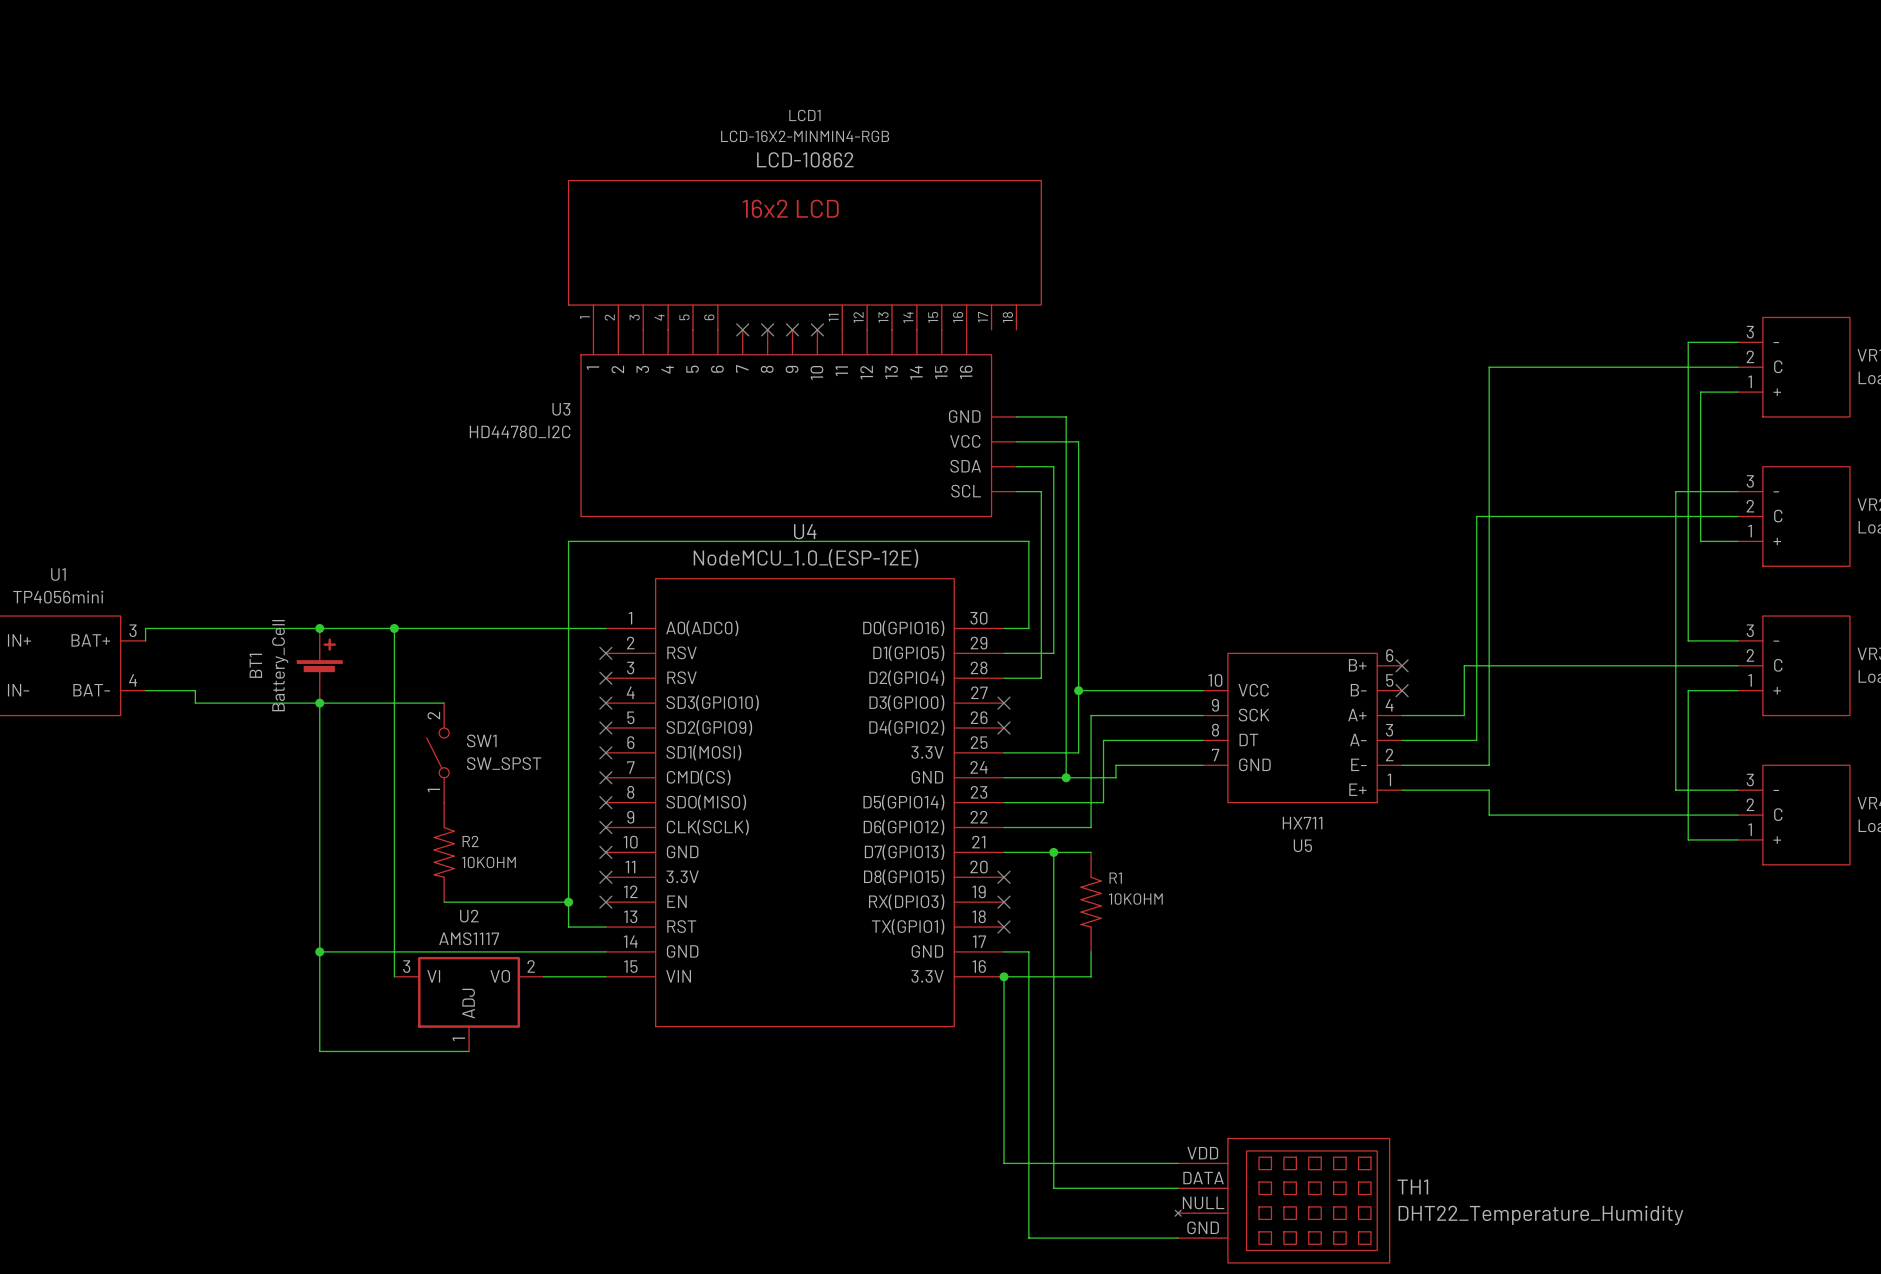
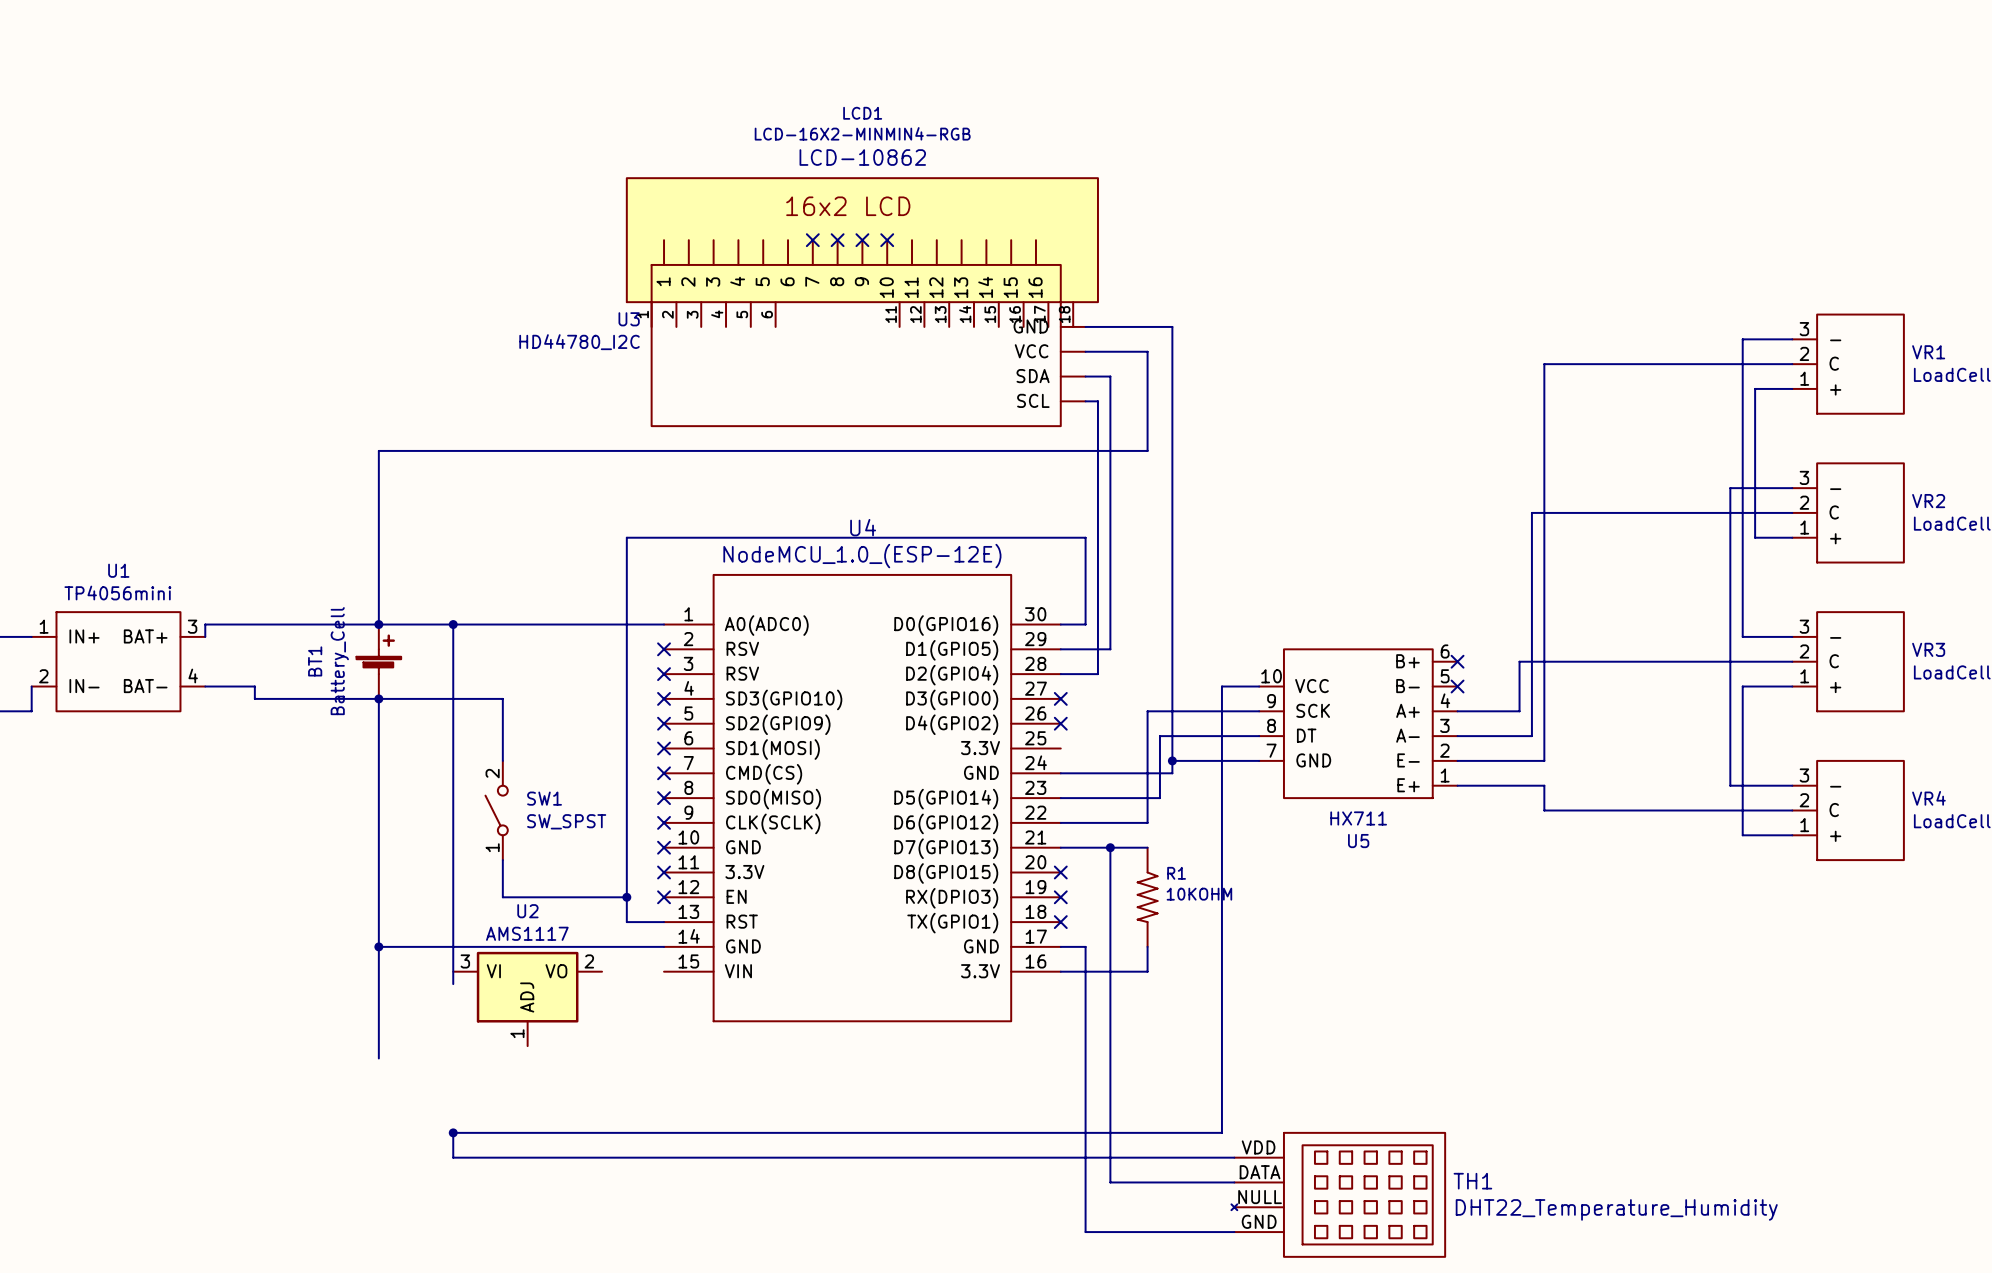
no-connect mark: none -> (812, 240)
no-connect mark: none -> (837, 240)
no-connect mark: none -> (862, 240)
no-connect mark: none -> (887, 240)
no-connect mark: (742, 329) -> none
no-connect mark: (767, 329) -> none
no-connect mark: (792, 329) -> none
no-connect mark: (817, 329) -> none
wire: none -> (1085, 326) (1172, 326) (1172, 760)
wire: none -> (1085, 351) (1147, 351) (1147, 450) (378, 450) (378, 624)
wire: (1016, 416) (1066, 416) (1066, 777) -> none
U3 position: (798, 423) -> (868, 333)
wire: (1016, 441) (1078, 441) (1078, 752) (1003, 752) -> none
wire: (1016, 466) (1053, 466) -> (1085, 376) (1110, 376) (1110, 463)
wire: (1016, 491) (1041, 491) -> (1085, 401) (1097, 401) (1097, 488)
wire: (1078, 690) (1165, 690) -> none
junction: (1078, 690) -> none
wire: none -> (502, 698) (502, 760)
SW1 position: (437, 752) -> (496, 810)
junction: none -> (1172, 760)
junction: (1066, 777) -> none
R2: 10KOHM (444, 852) -> none
wire: none -> (453, 971) (453, 984)
wire: (543, 976) (605, 976) -> none
wire: (1003, 976) (1003, 1163) -> (1221, 686) (1221, 1132) (453, 1132) (453, 1157) (1060, 1157)
junction: (1003, 976) -> none
wire: (319, 1051) (469, 1051) -> (378, 1046) (378, 1058)
junction: none -> (453, 1132)

